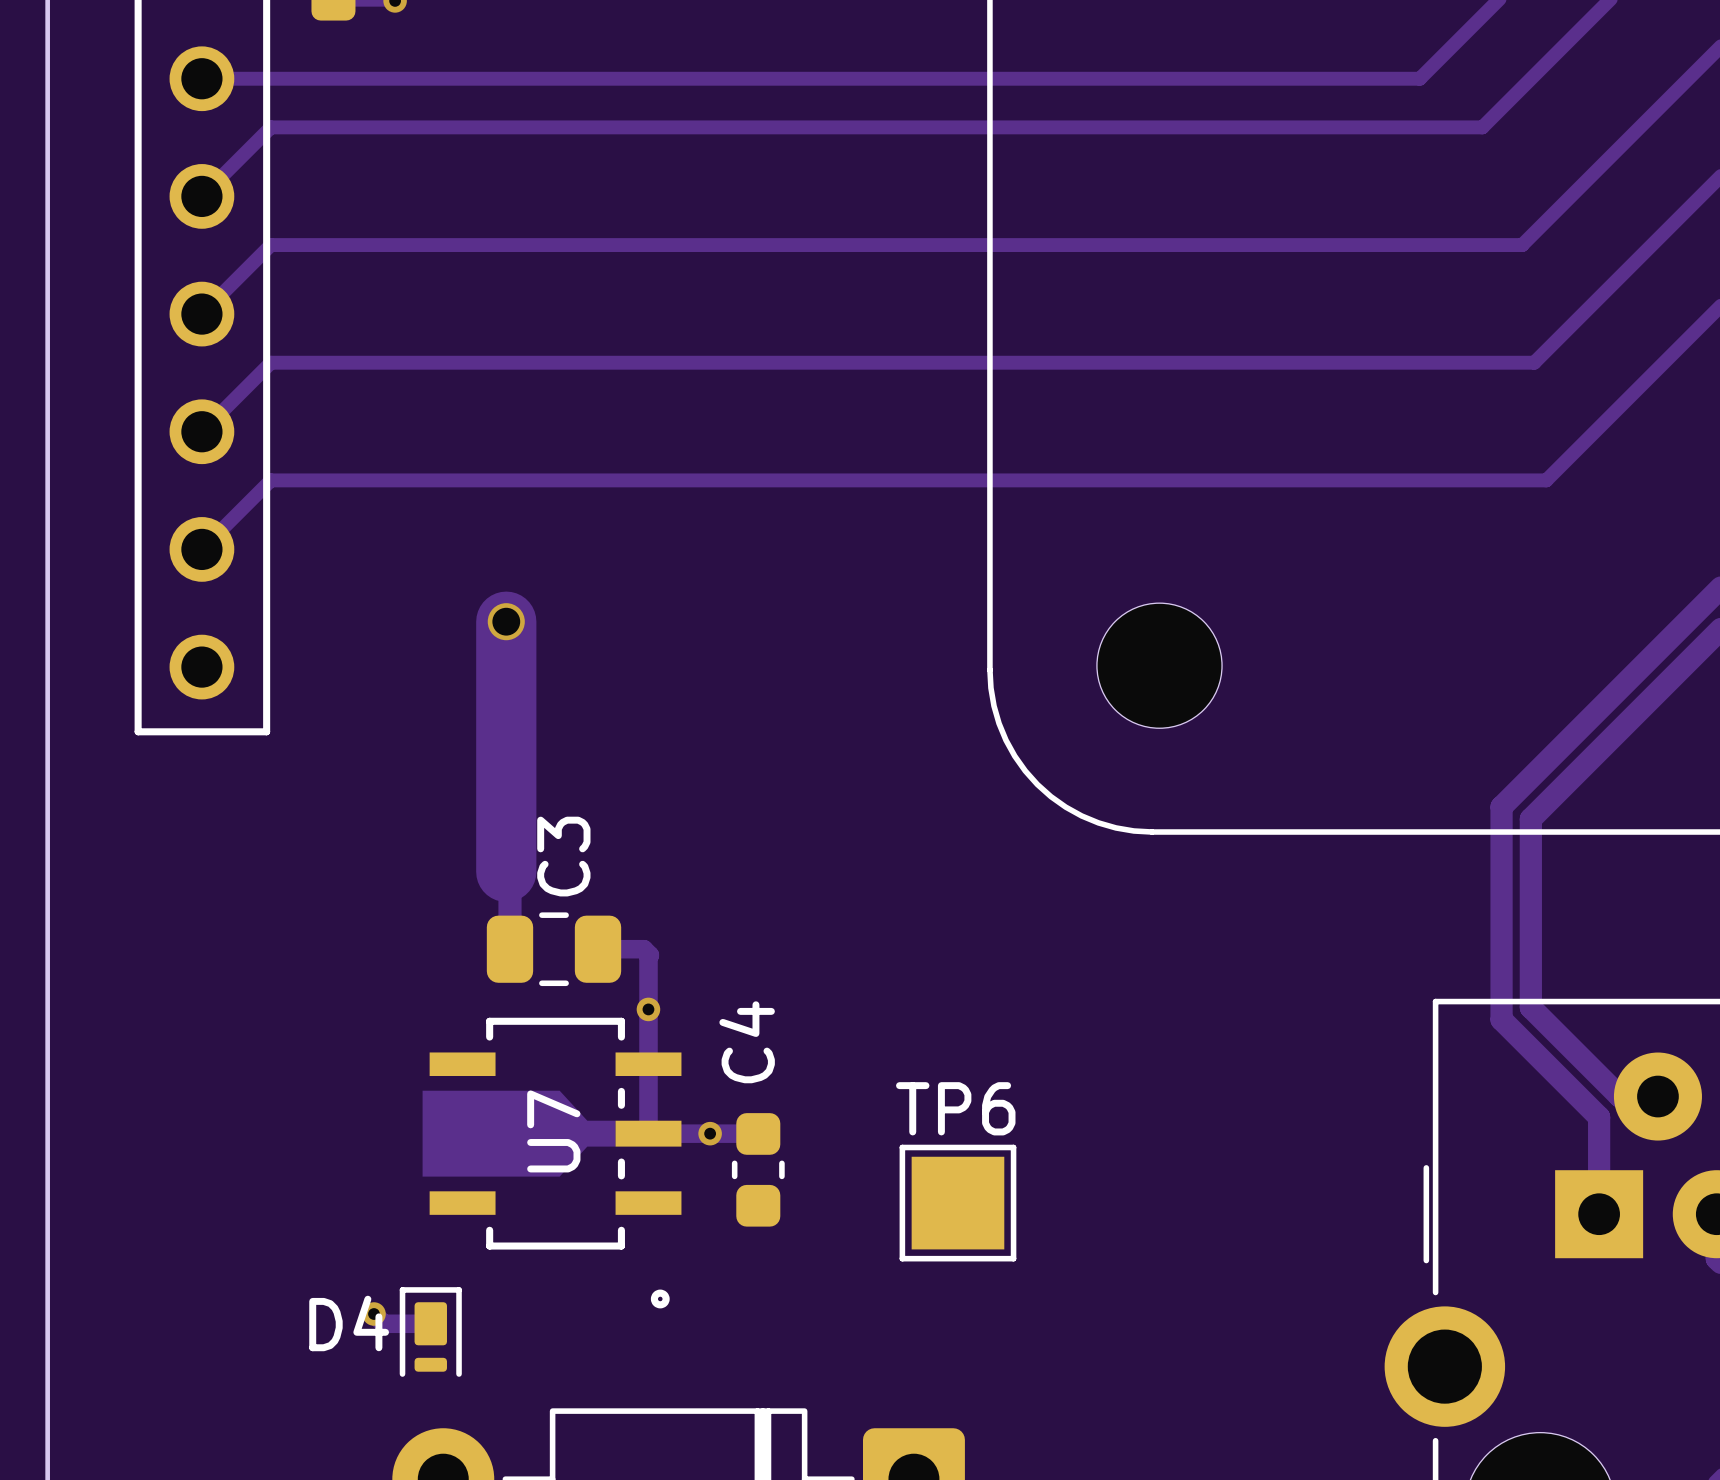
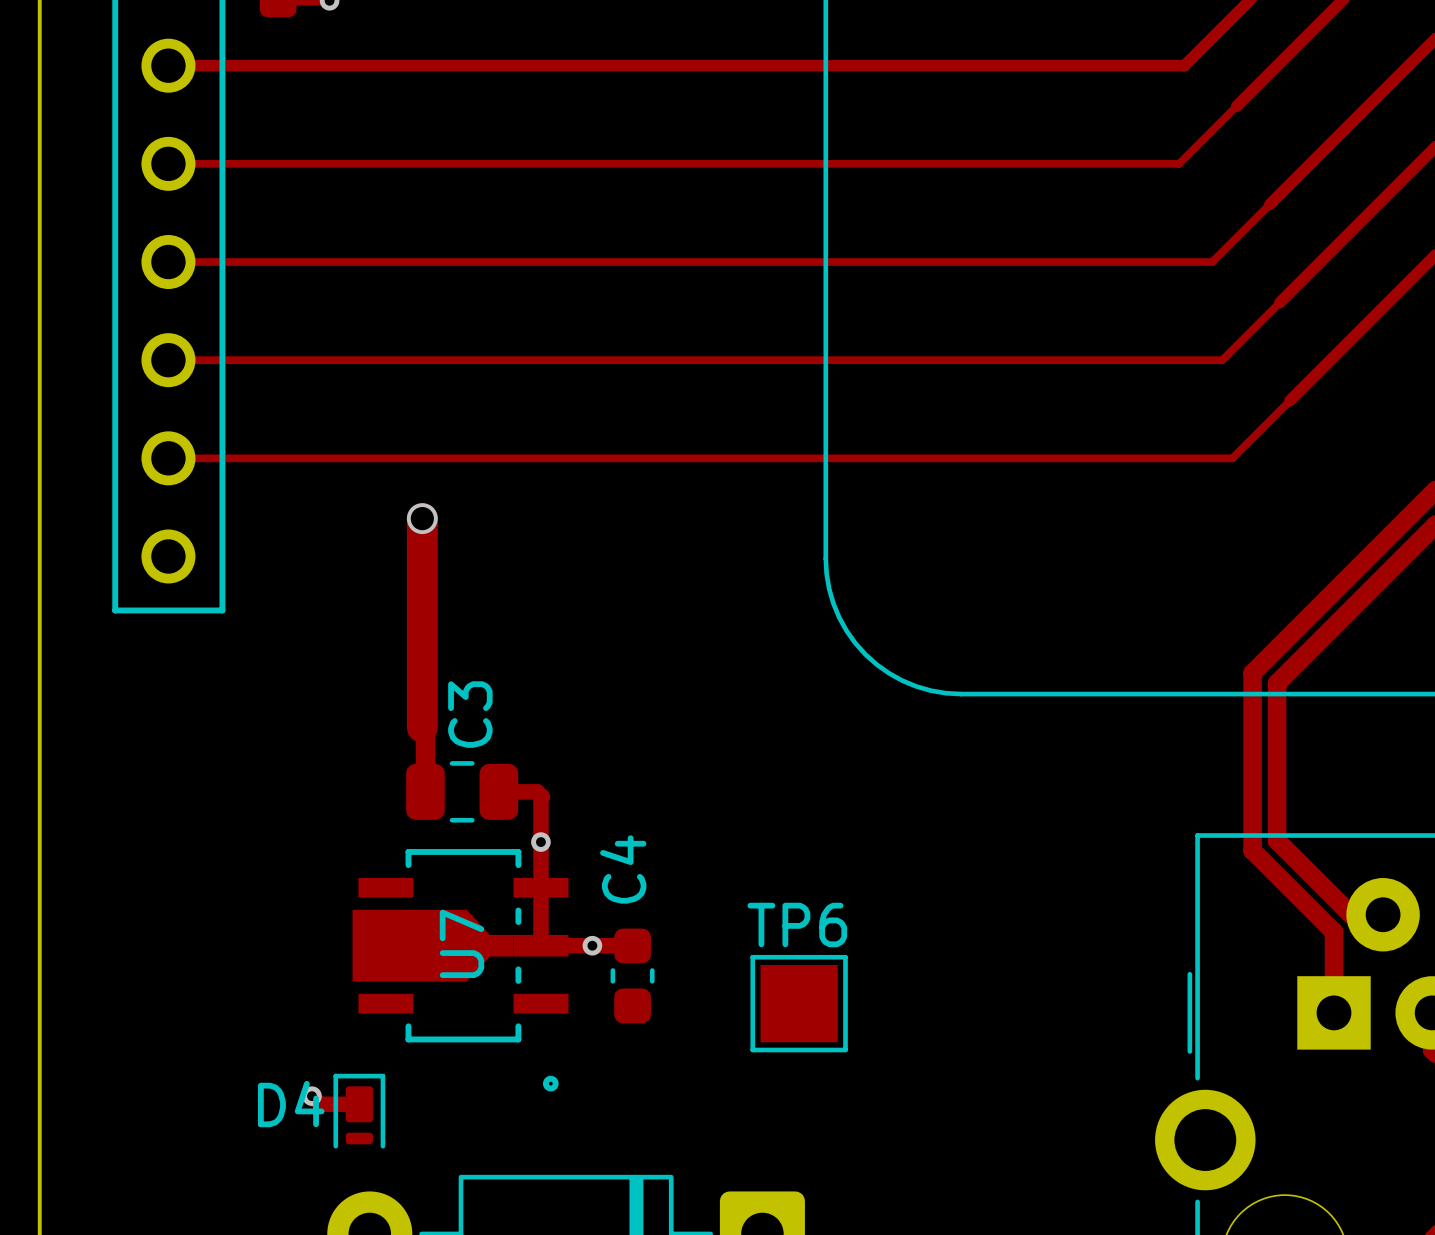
track: (1482, 127) (270, 127) (201, 196) -> (1236, 106) (1179, 163) (168, 163)
track: (1522, 245) (270, 245) (201, 314) -> (1269, 204) (1212, 262) (168, 262)
track: (1534, 362) (270, 362) (201, 431) -> (1279, 302) (1222, 360) (168, 360)
track: (1546, 480) (270, 480) (201, 549) -> (1289, 400) (1232, 458) (168, 458)
track width: thick (506, 621) (506, 871) -> thin (422, 518) (422, 727)
part: (1159, 665) -> none

